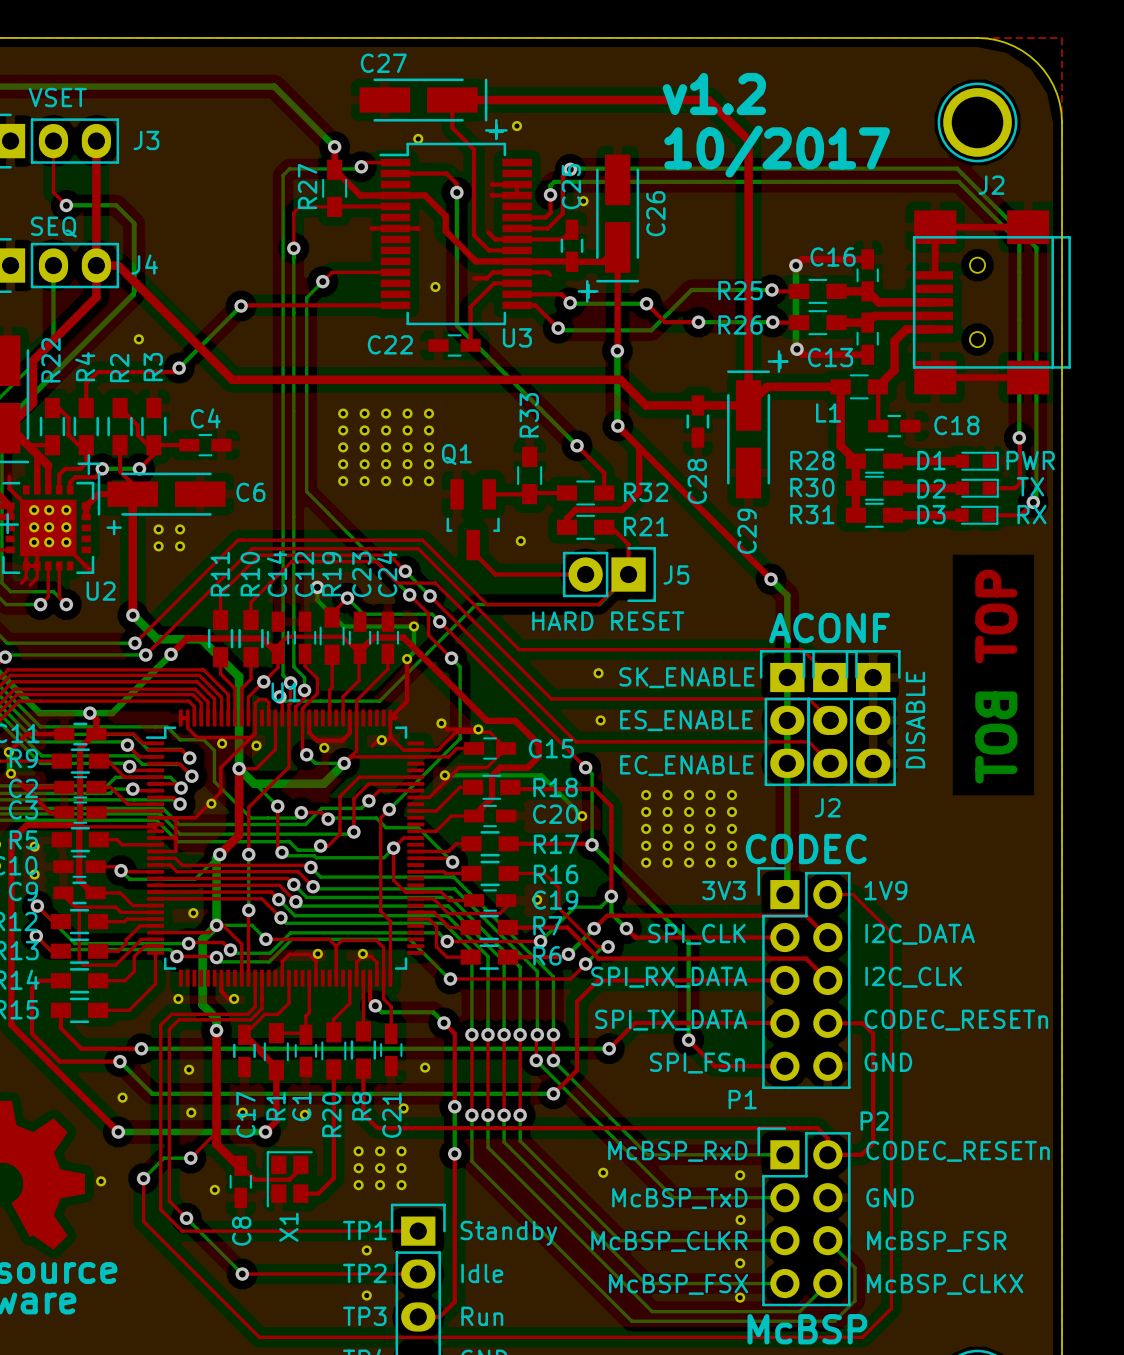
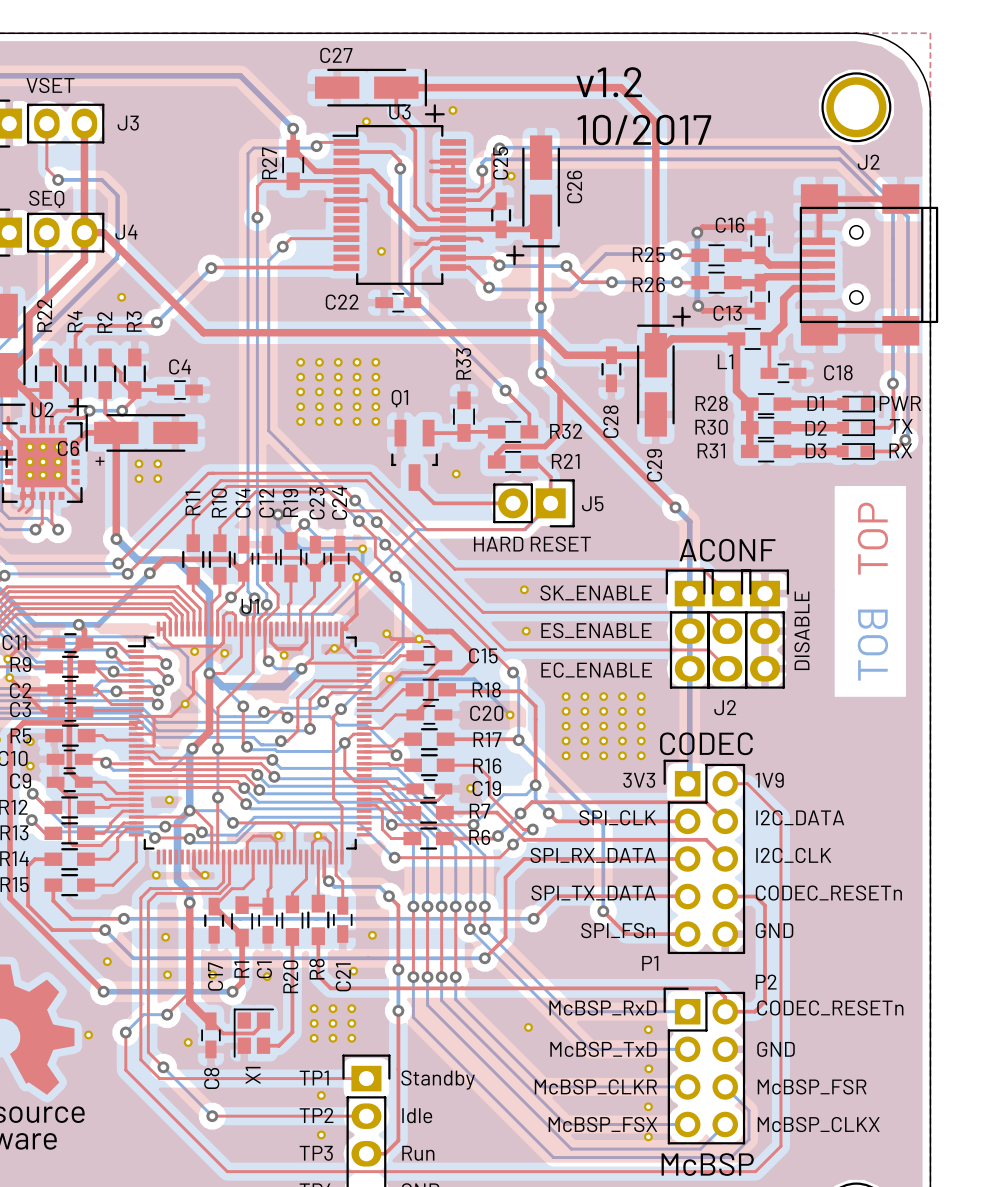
U3 name position: U3 (517, 337) -> U3 (399, 111)
C6 name position: C6 (250, 492) -> C6 (68, 448)
U2 name position: U2 (101, 591) -> U2 (42, 409)

